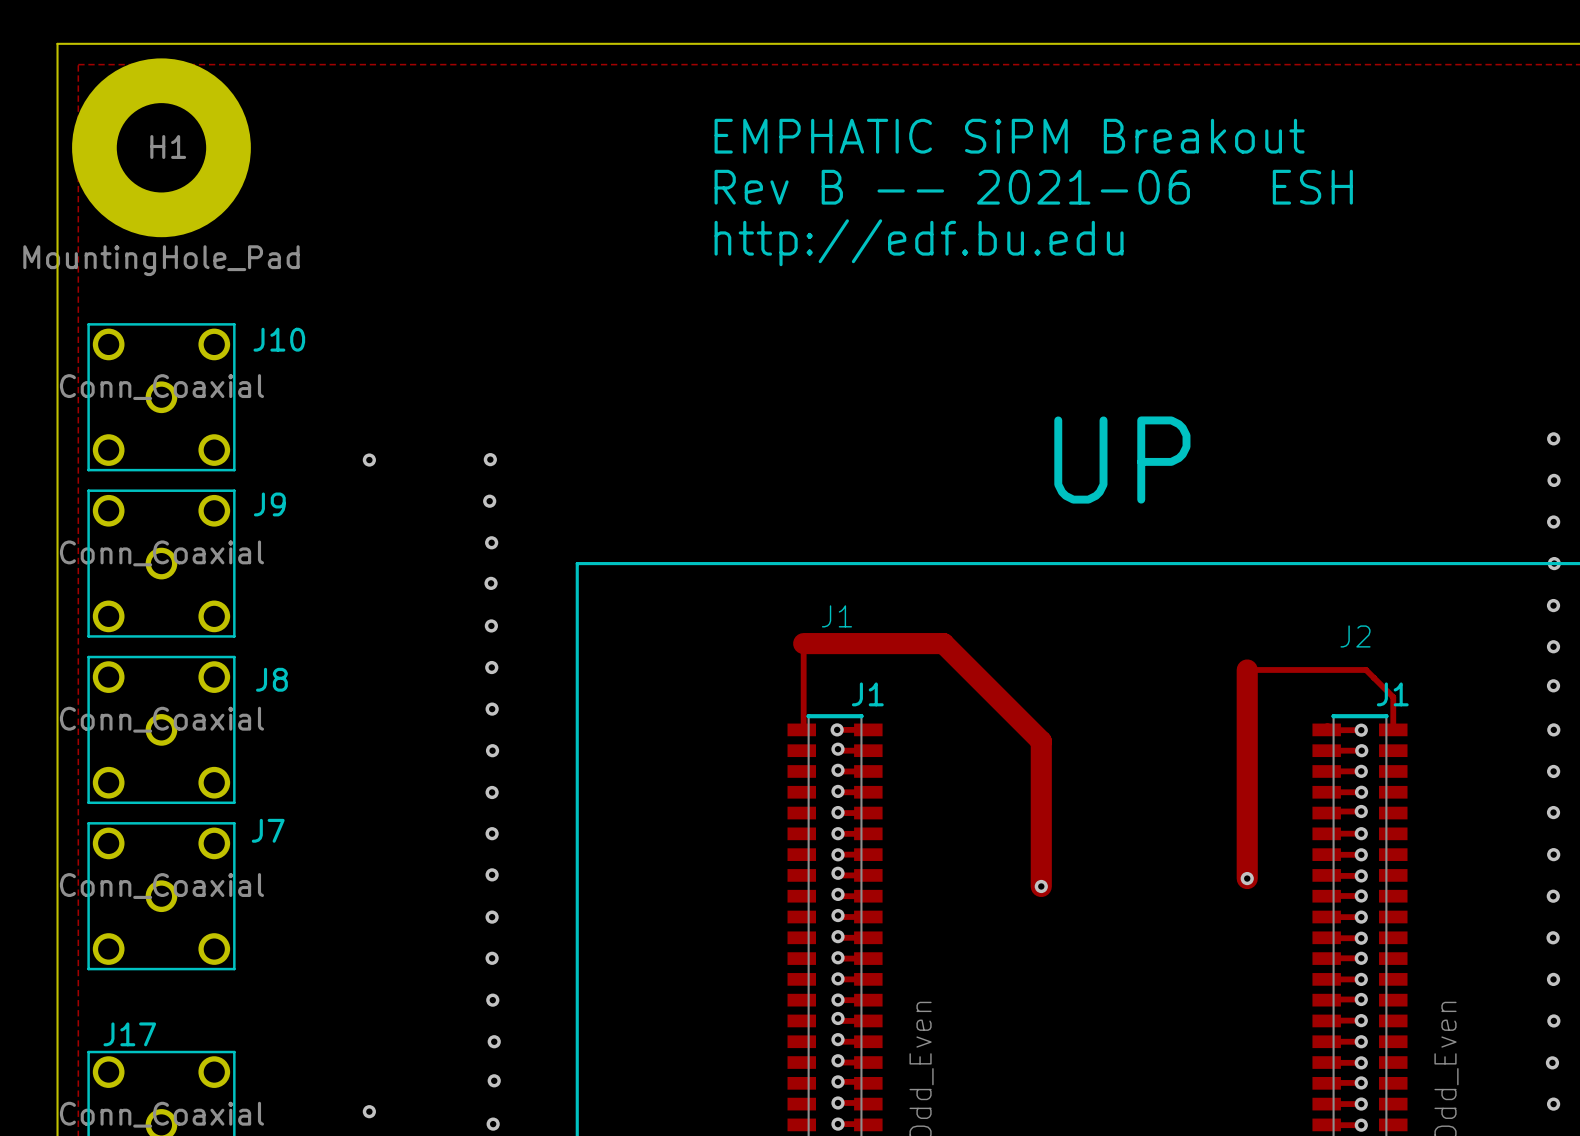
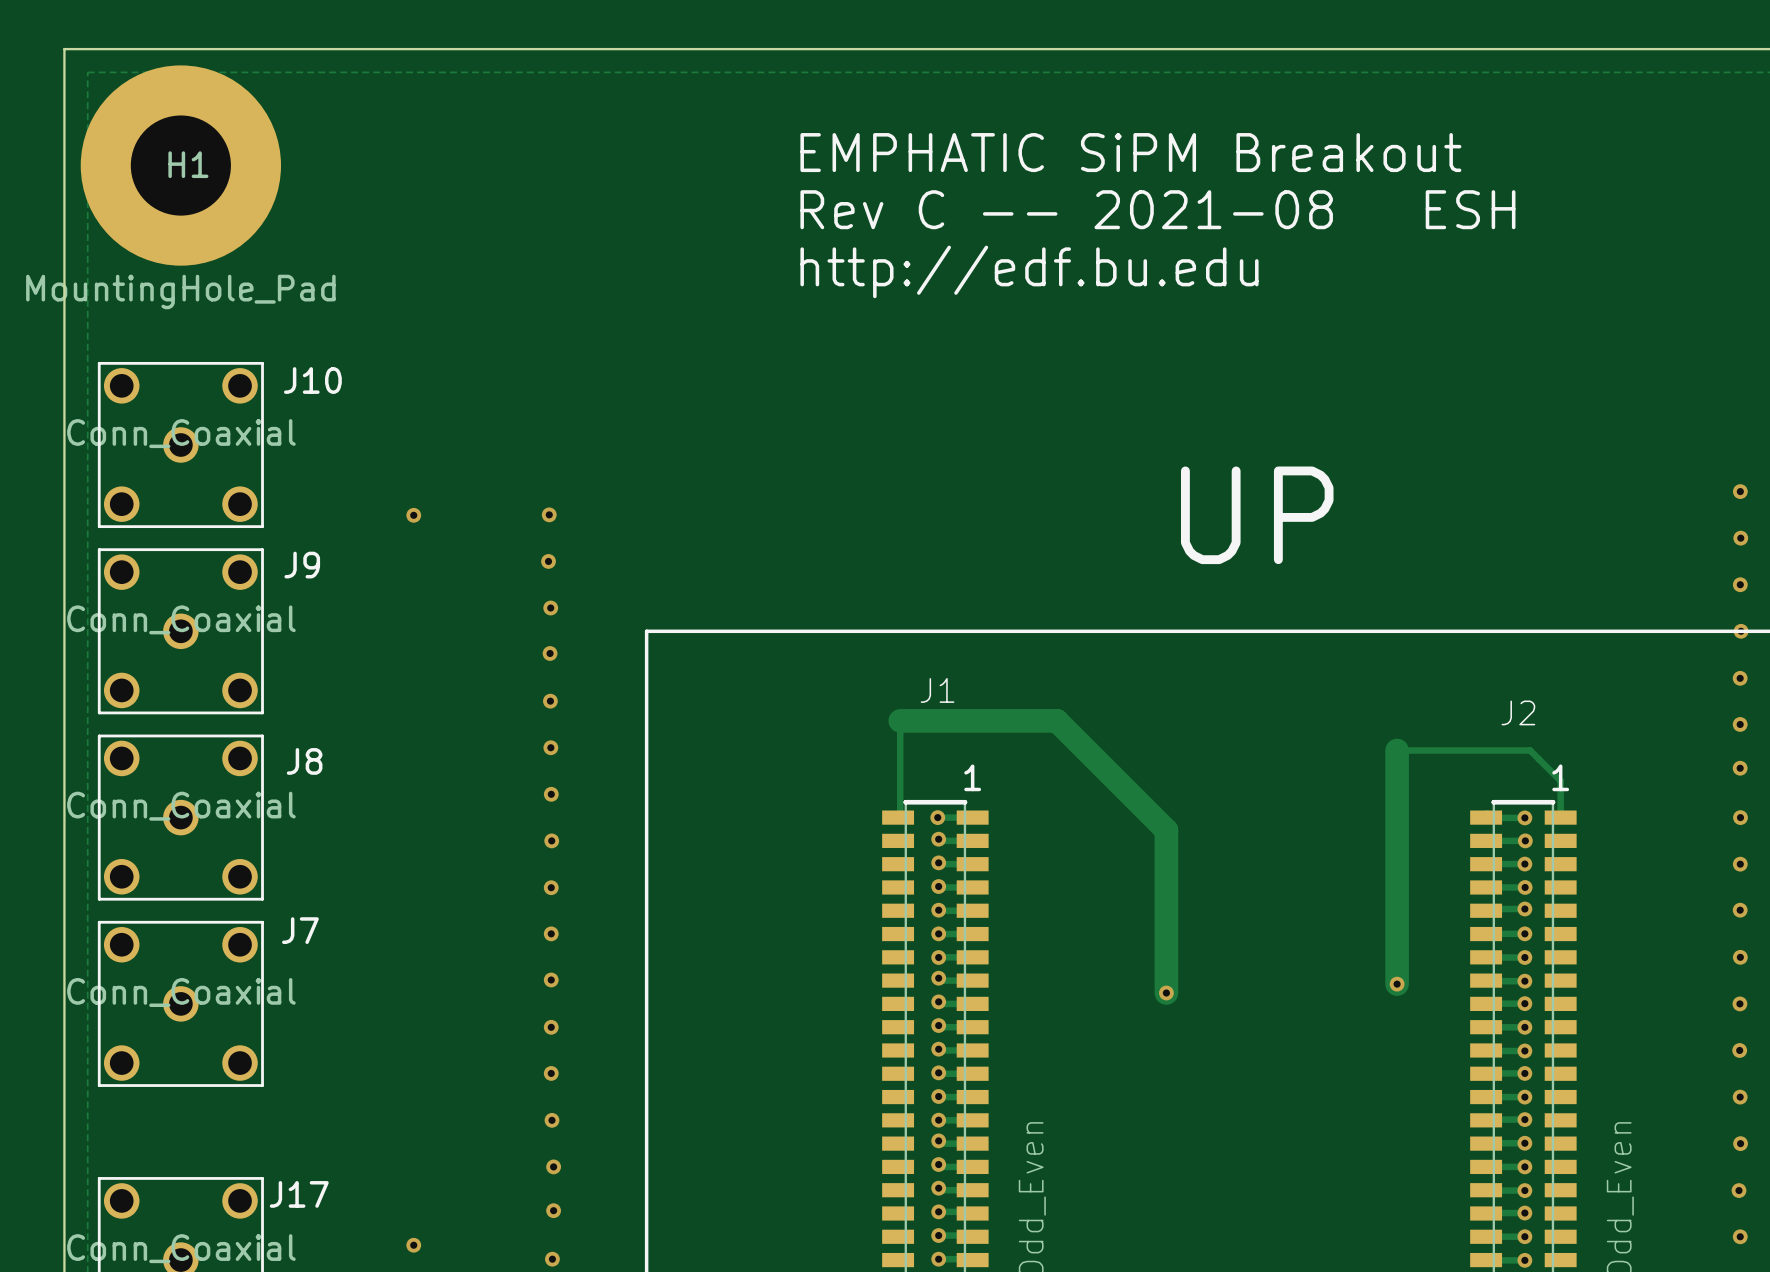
text: Rev B -- 2021-06 ESH (1033, 187) -> Rev C -- 2021-08 ESH (1157, 209)
J1 text: J1 (867, 694) -> 1 (972, 777)
J2 text: J1 (1392, 694) -> 1 (1560, 777)
J17 name position: J17 (129, 1034) -> J17 (299, 1194)

